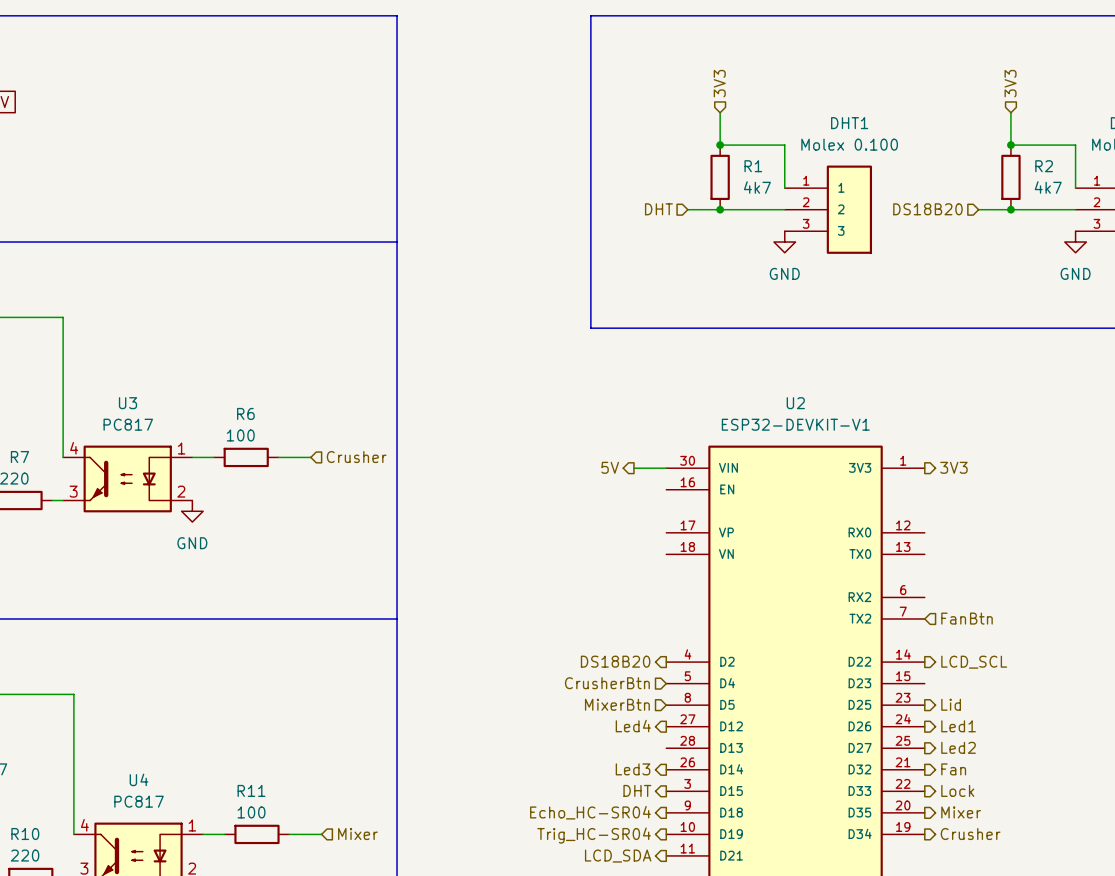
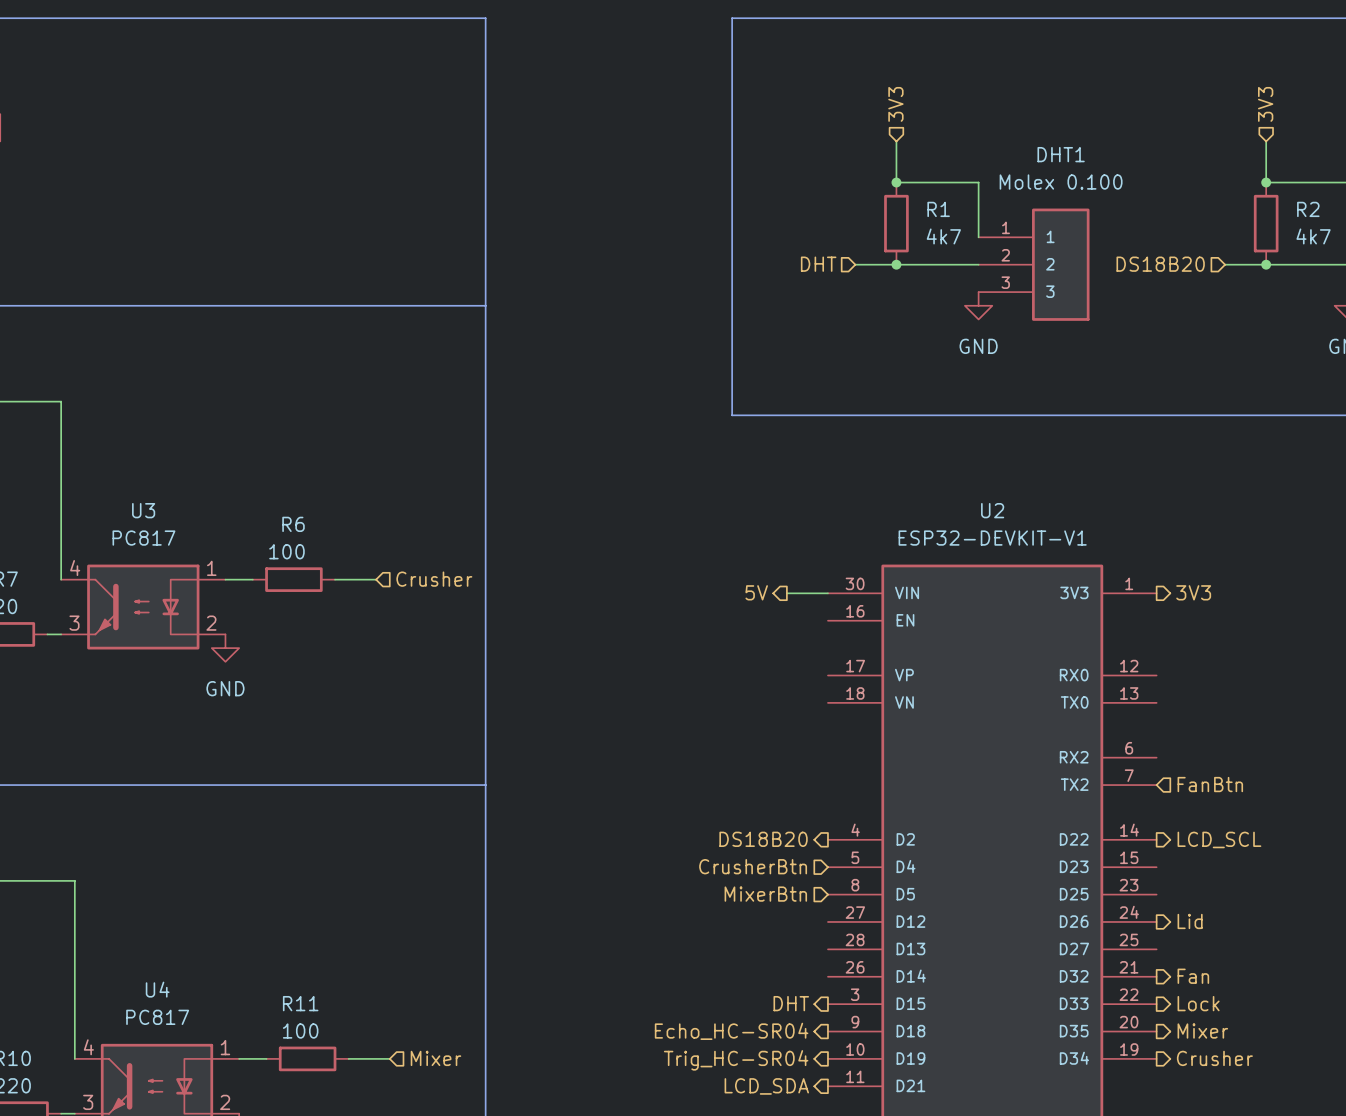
hierarchical label: Lid (951, 704) -> none
hierarchical label: Led4 (633, 726) -> none
hierarchical label: Led1 (958, 726) -> Lid (1190, 921)
hierarchical label: Led2 (958, 747) -> none
hierarchical label: Led3 (633, 769) -> none

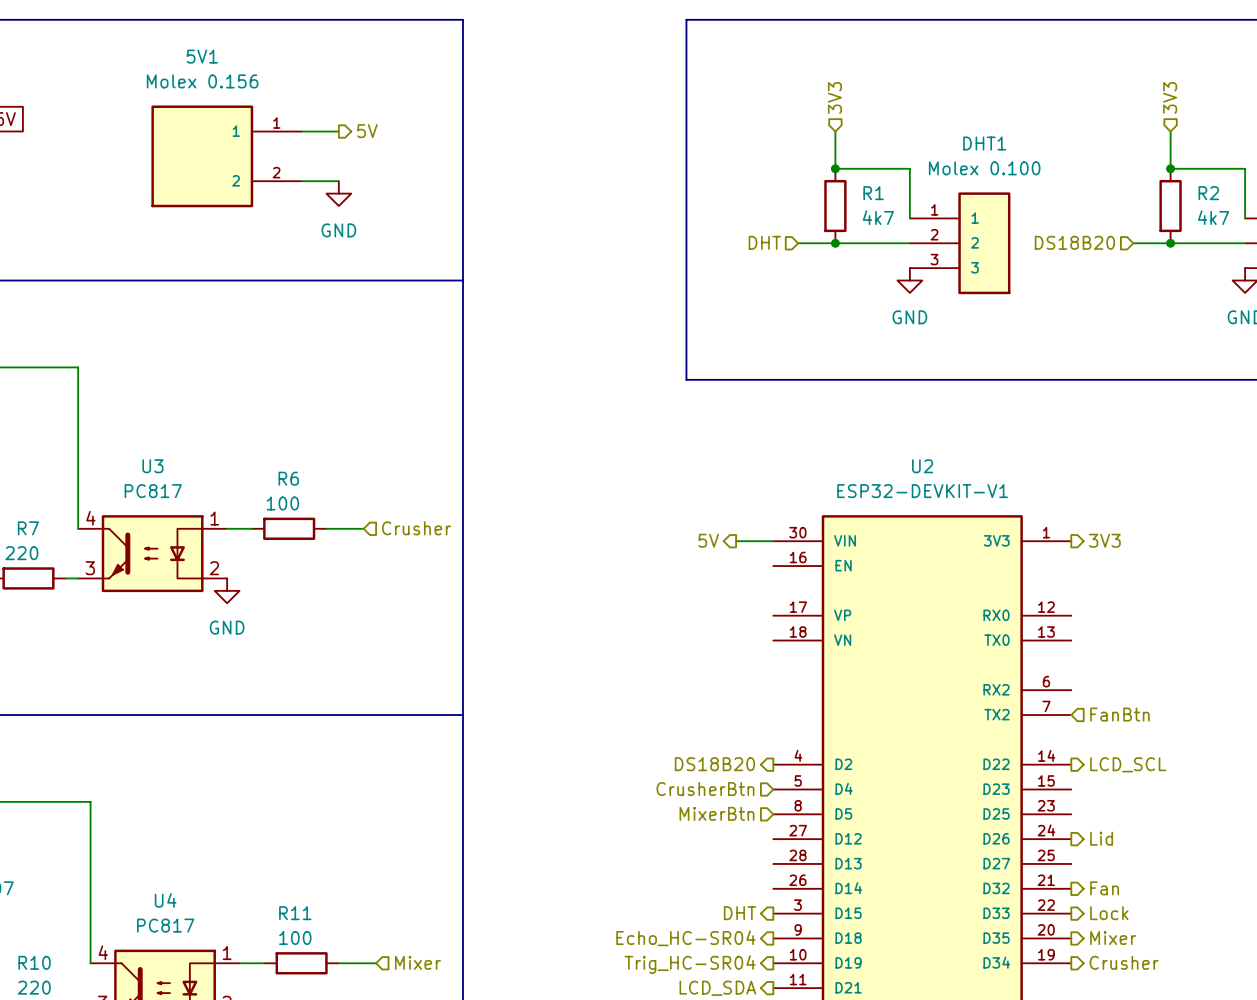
hierarchical label: none -> 5V (367, 131)
wire: none -> (301, 131) (338, 131)
5V1: none -> Molex 0.156 (226, 156)
wire: none -> (301, 181) (338, 181)
power symbol: none -> GND (338, 193)

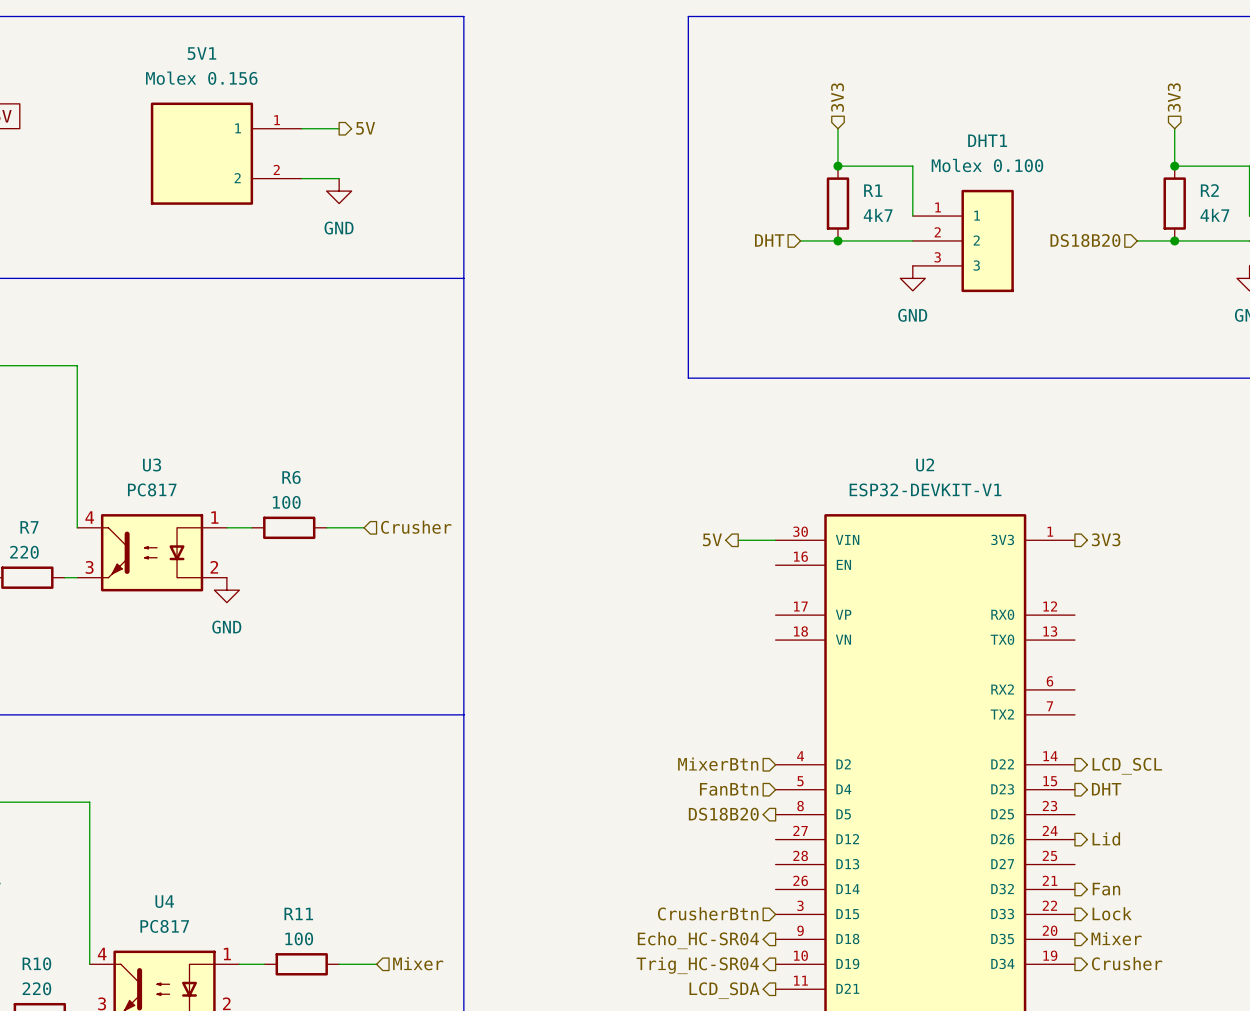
hierarchical label: FanBtn (1119, 714) -> none
hierarchical label shape: output (714, 764) -> input (718, 764)
hierarchical label: DS18B20 (714, 764) -> MixerBtn (718, 764)
hierarchical label: CrusherBtn (705, 789) -> FanBtn (729, 789)
hierarchical label: none -> DHT (1106, 789)
hierarchical label shape: input (716, 813) -> output (723, 814)
hierarchical label: MixerBtn (716, 813) -> DS18B20 (723, 814)
hierarchical label shape: output (740, 913) -> input (708, 913)
hierarchical label: DHT (740, 913) -> CrusherBtn (708, 913)

